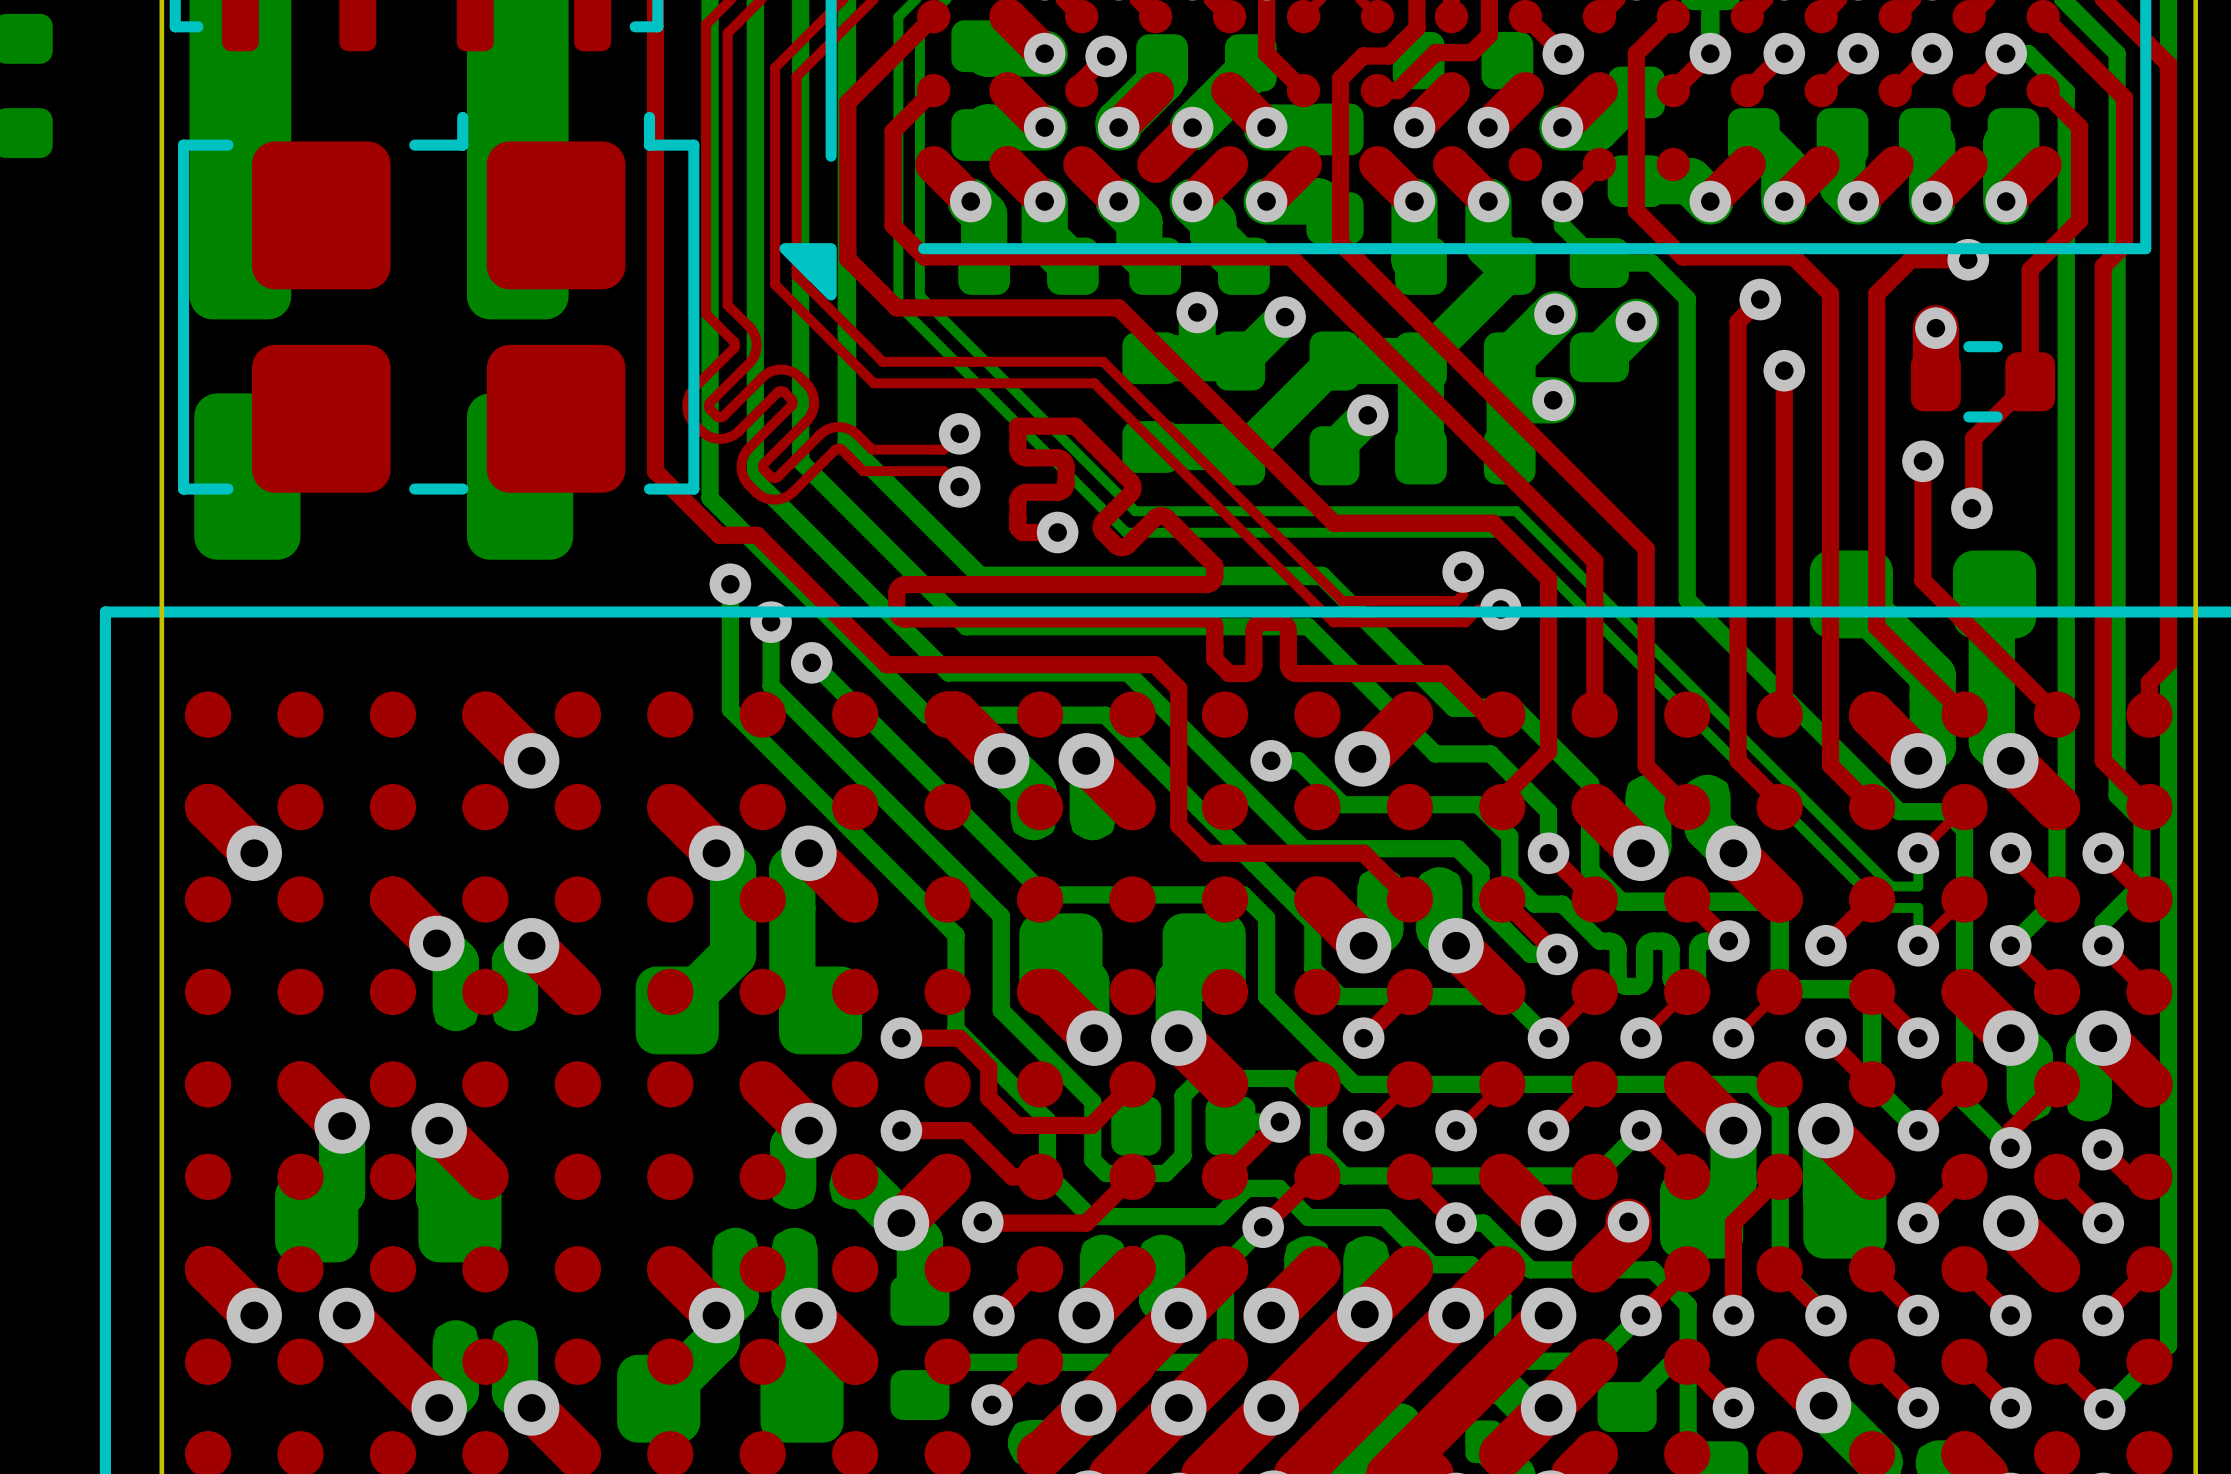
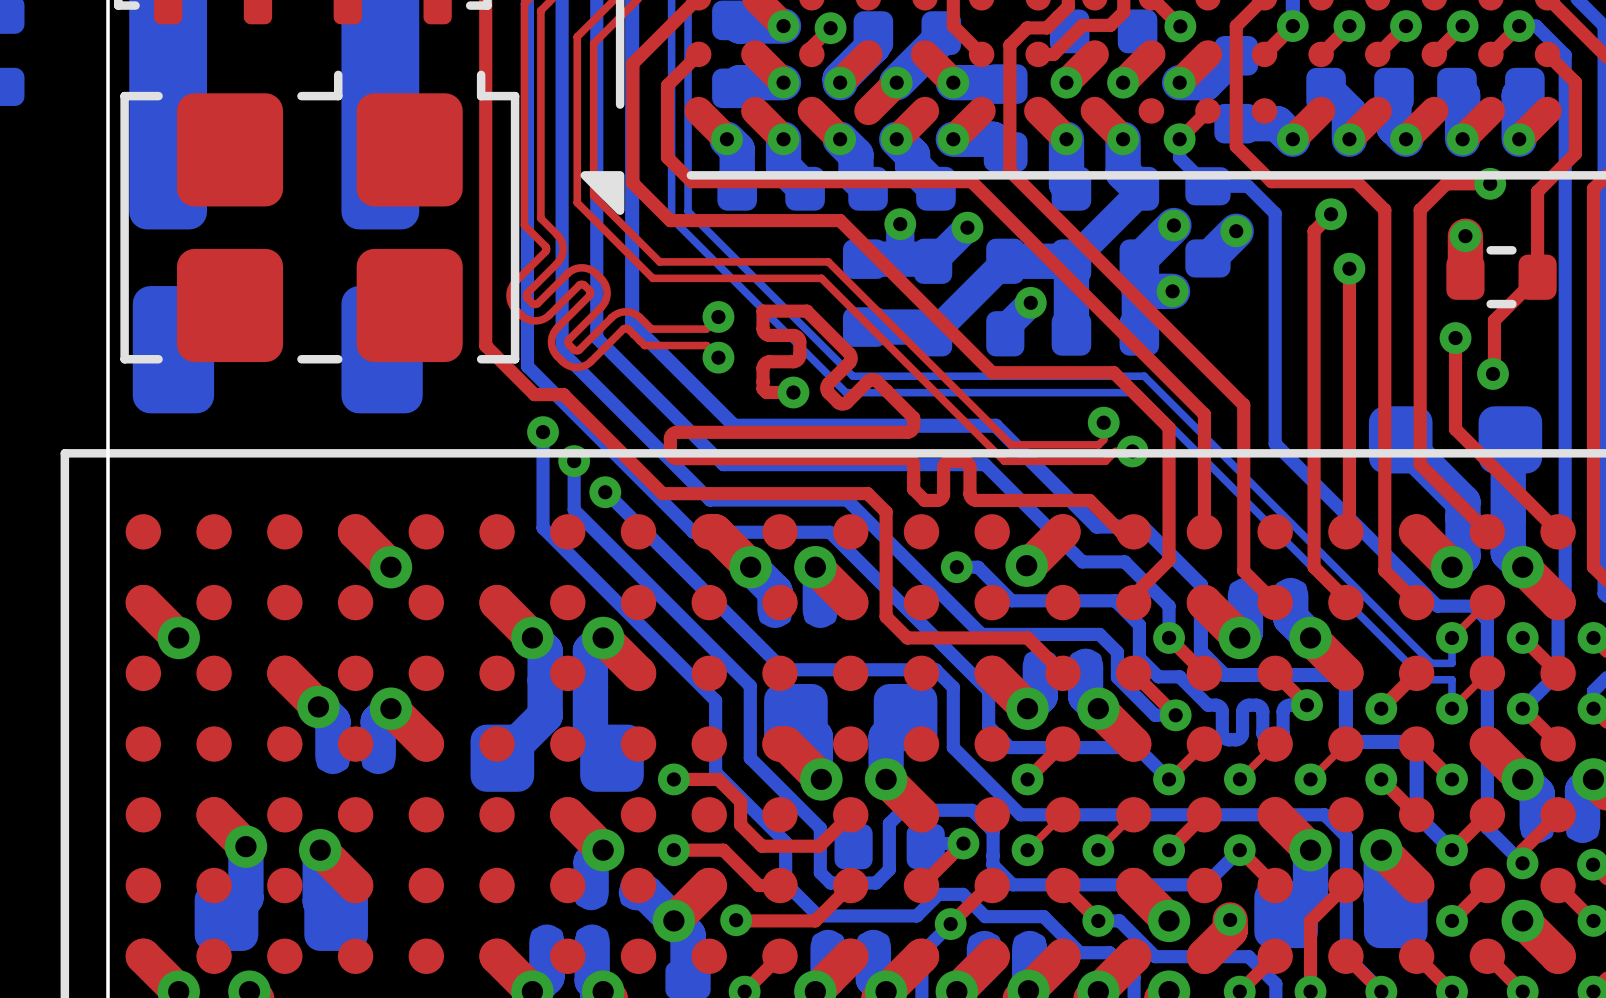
top track: (1317, 506) (1334, 523) (1493, 523) -> (992, 372) (1113, 372) (1126, 385)

